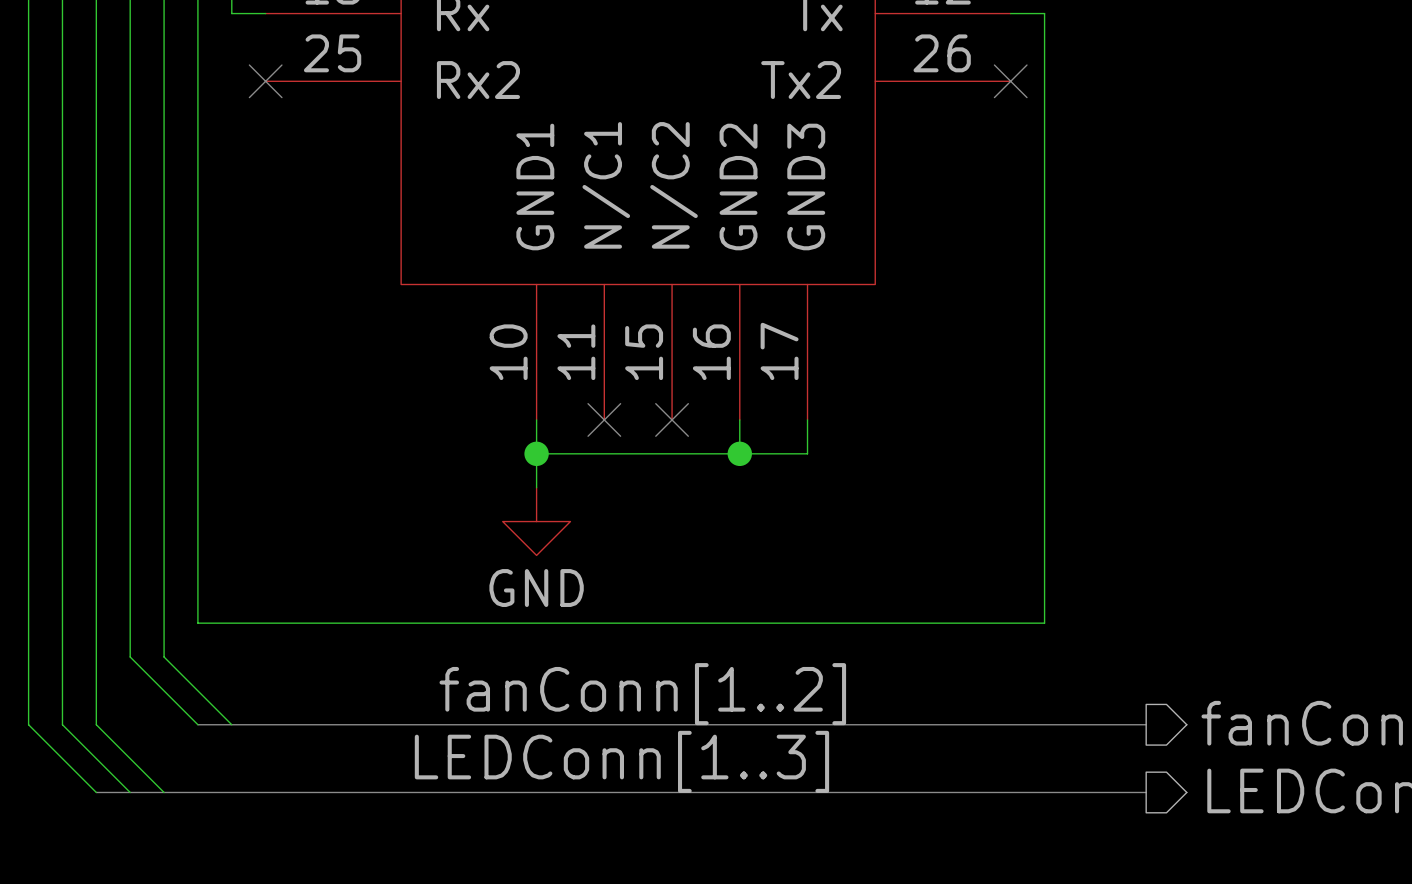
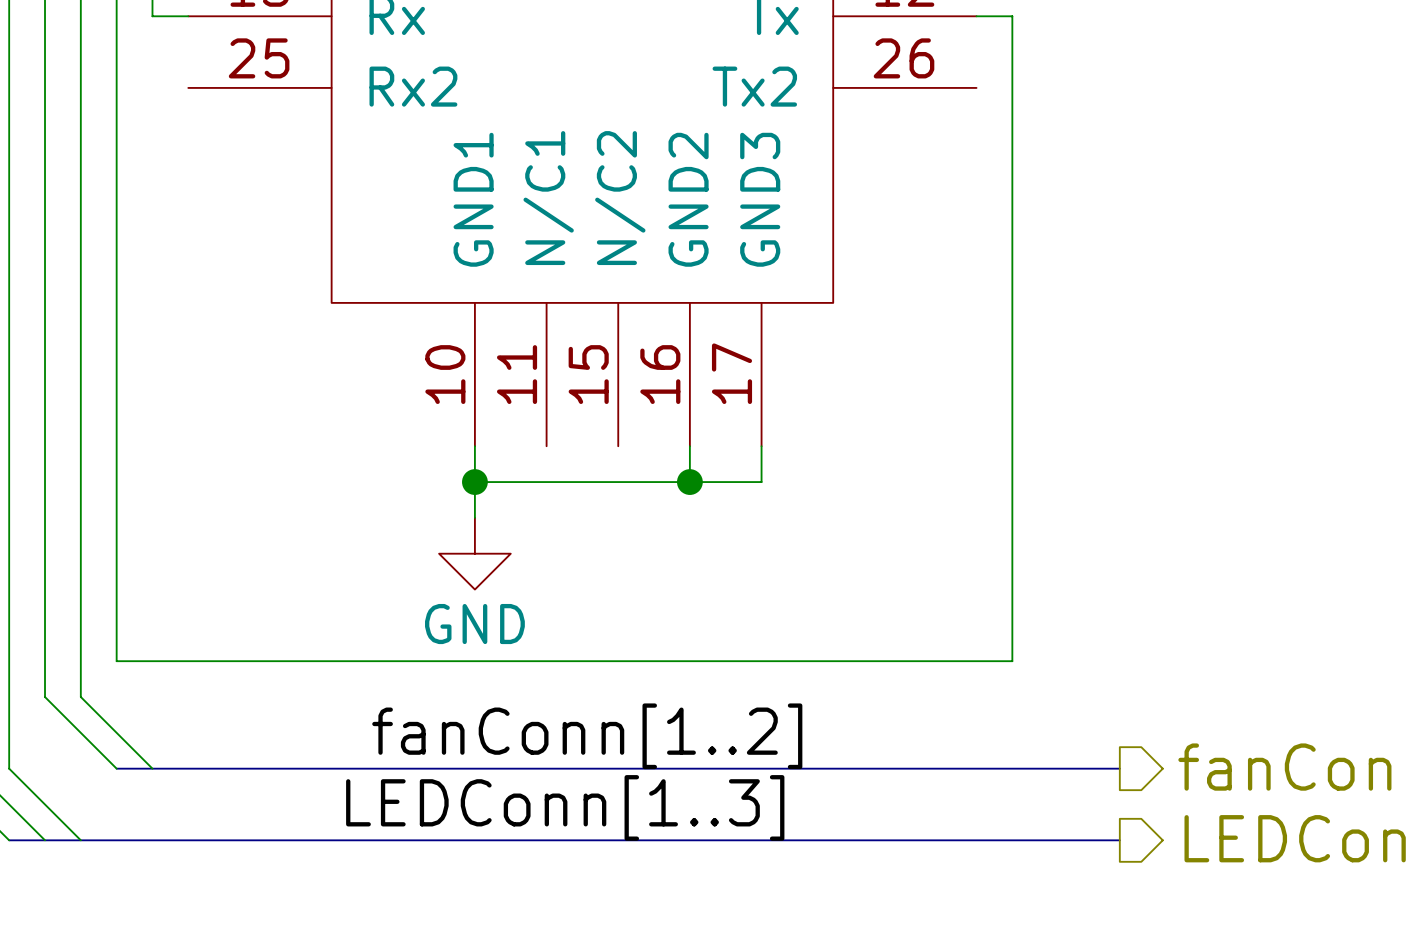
no-connect mark: (265, 81) -> none
no-connect mark: (1010, 81) -> none
no-connect mark: (604, 419) -> none
no-connect mark: (672, 419) -> none

